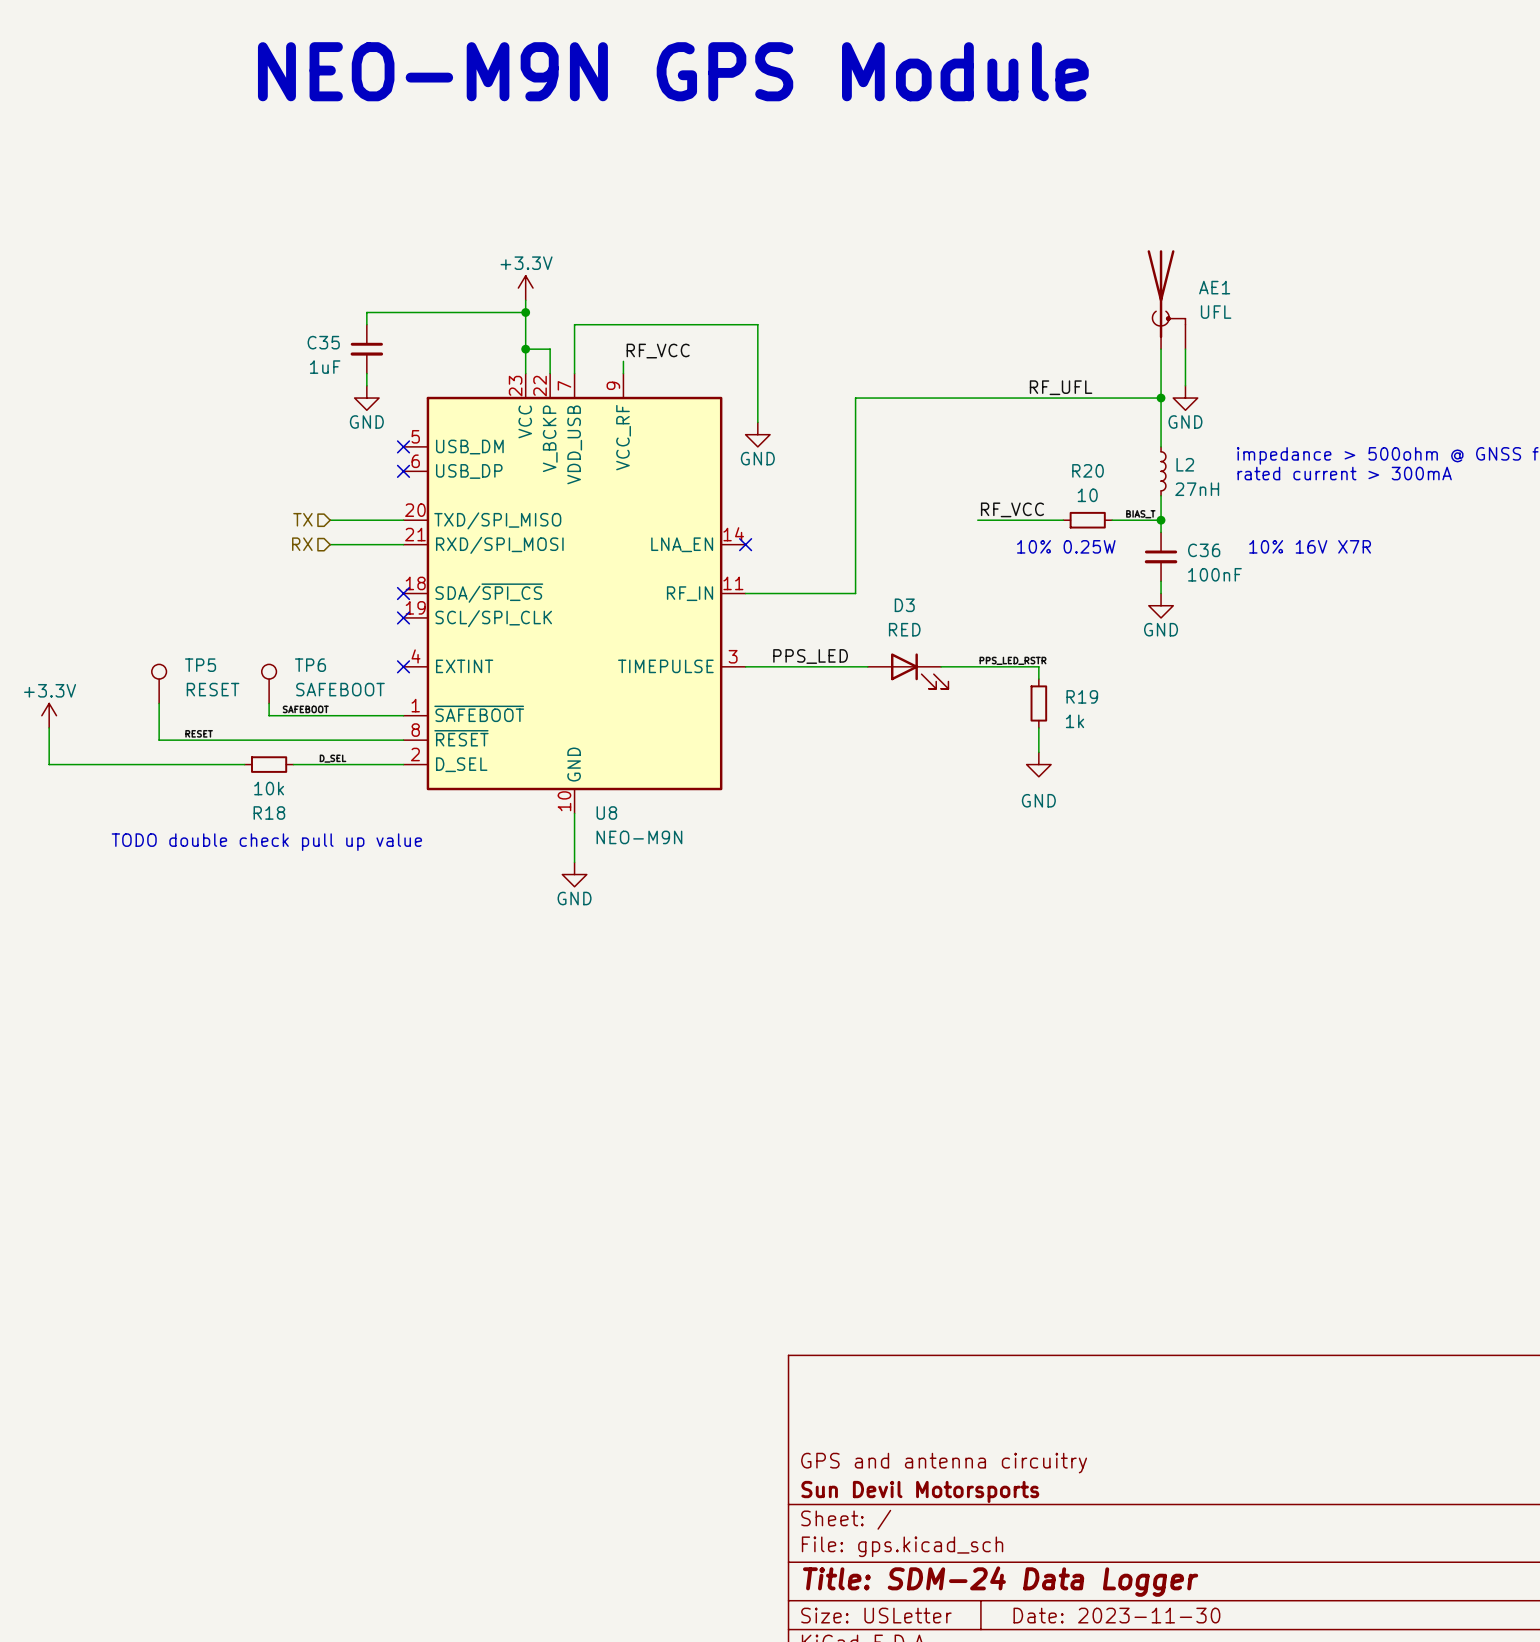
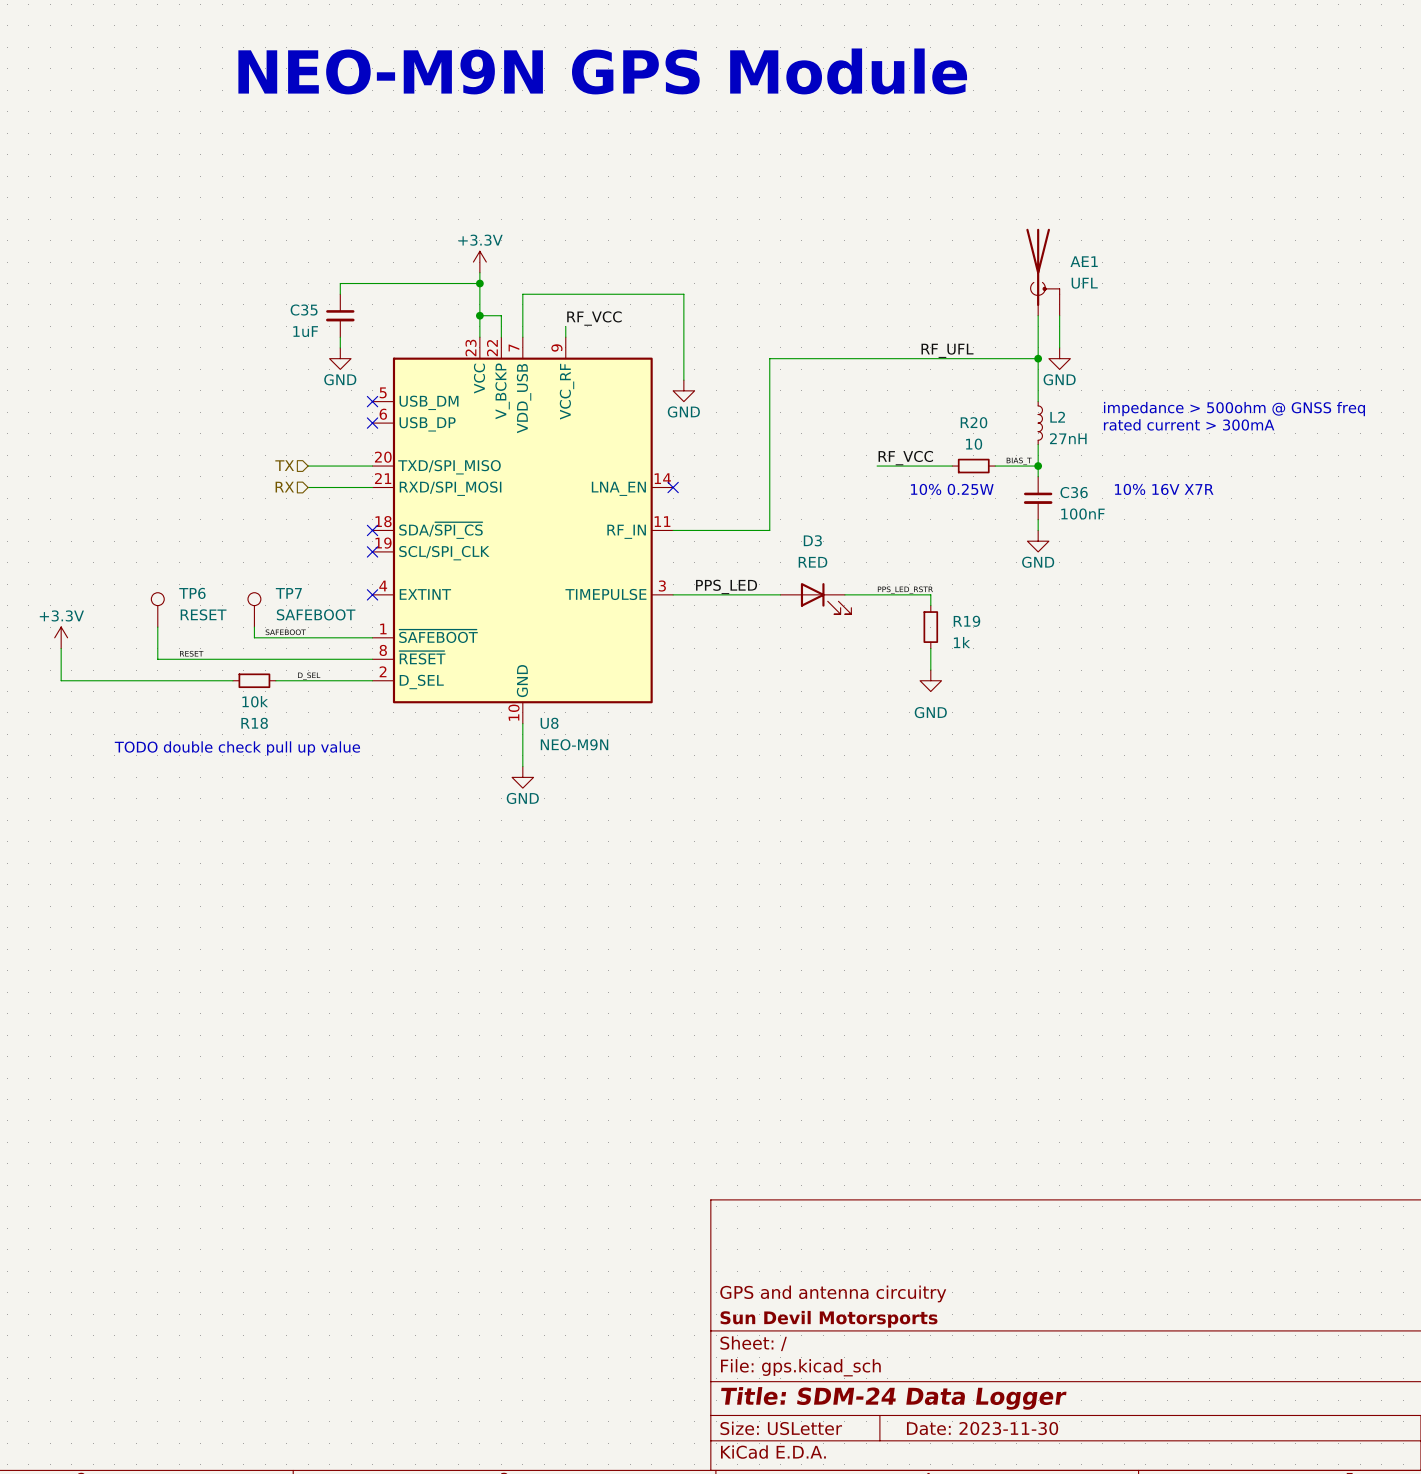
TP5 name: TP5 (200, 665) -> TP6 (192, 593)
TP6 name: TP6 (310, 665) -> TP7 (288, 593)

